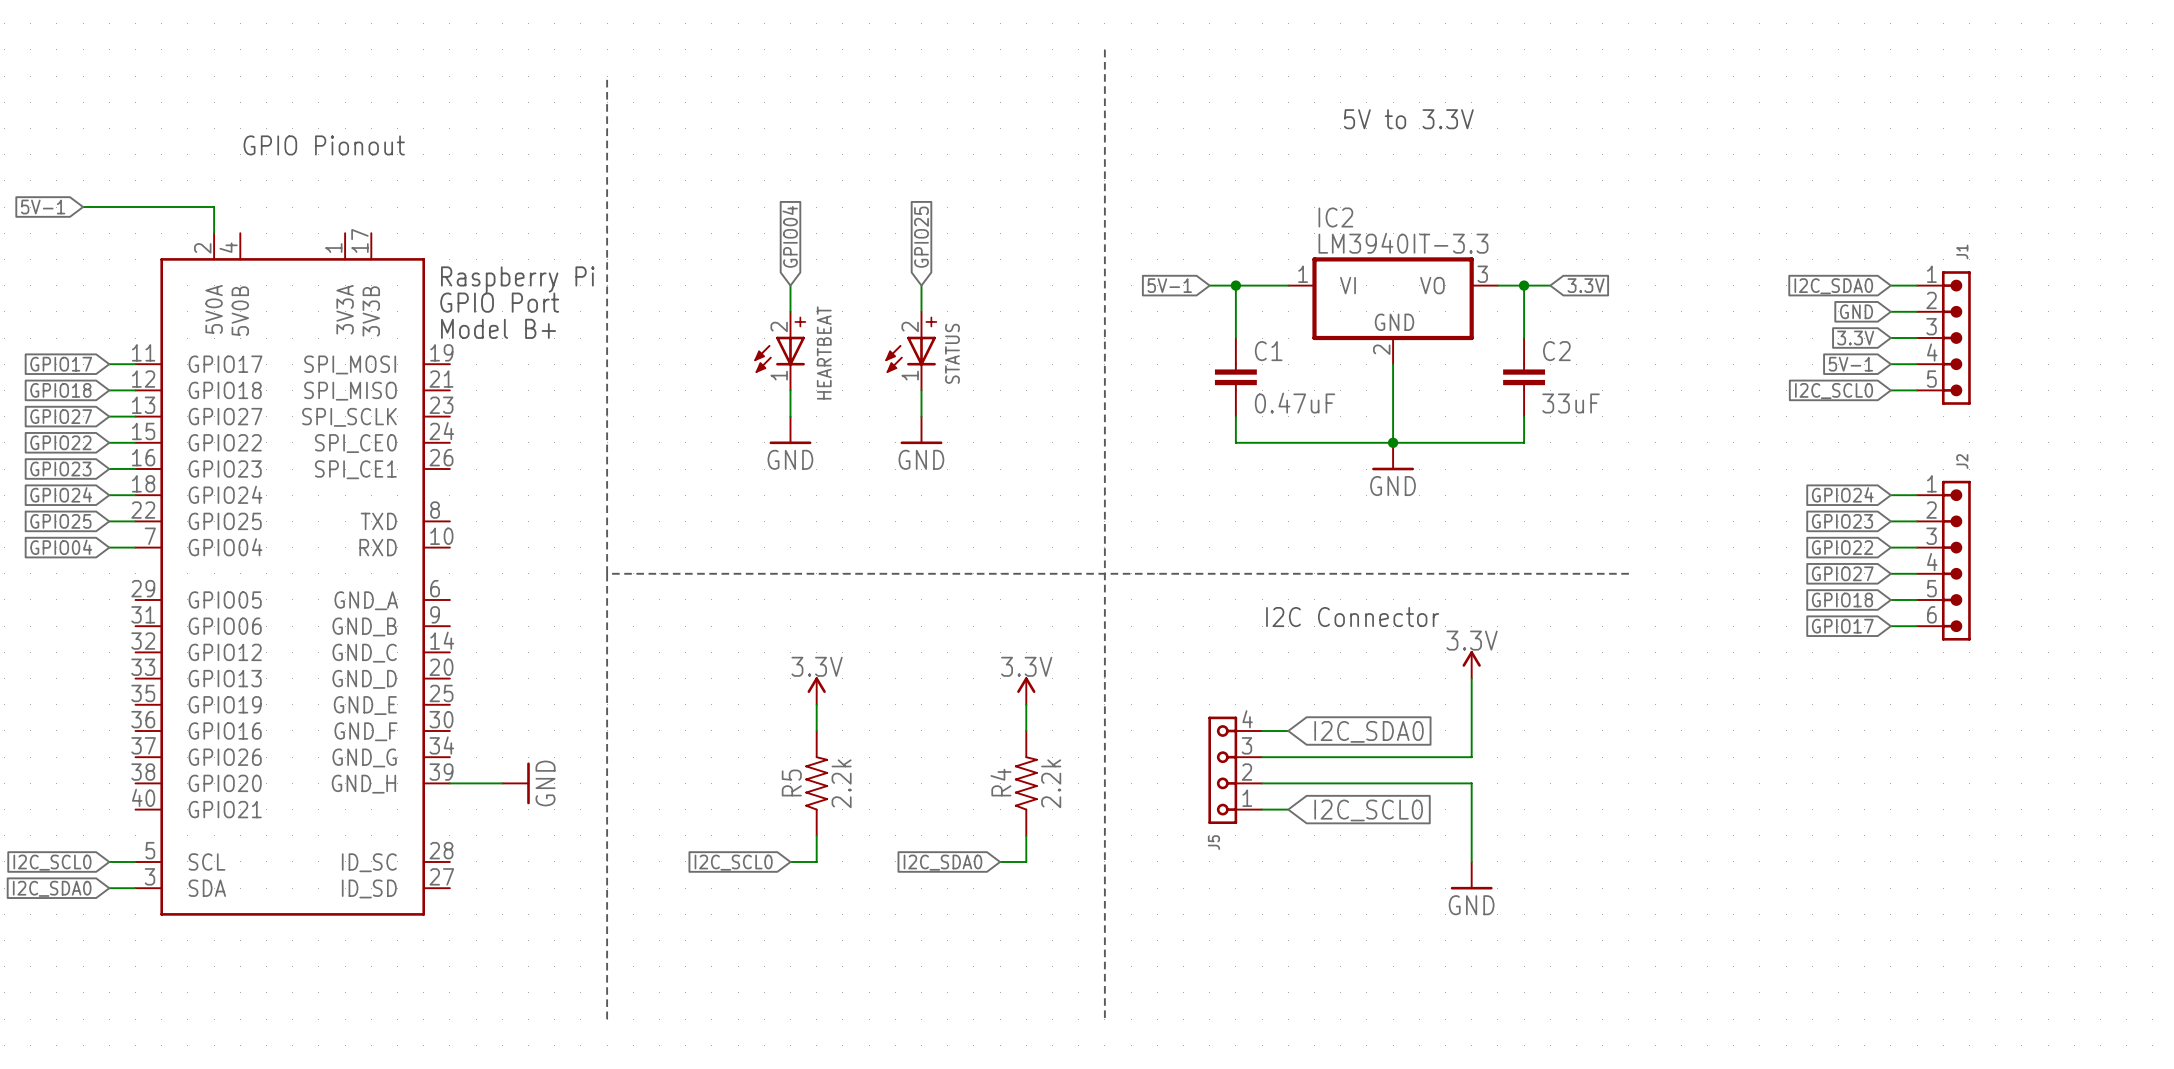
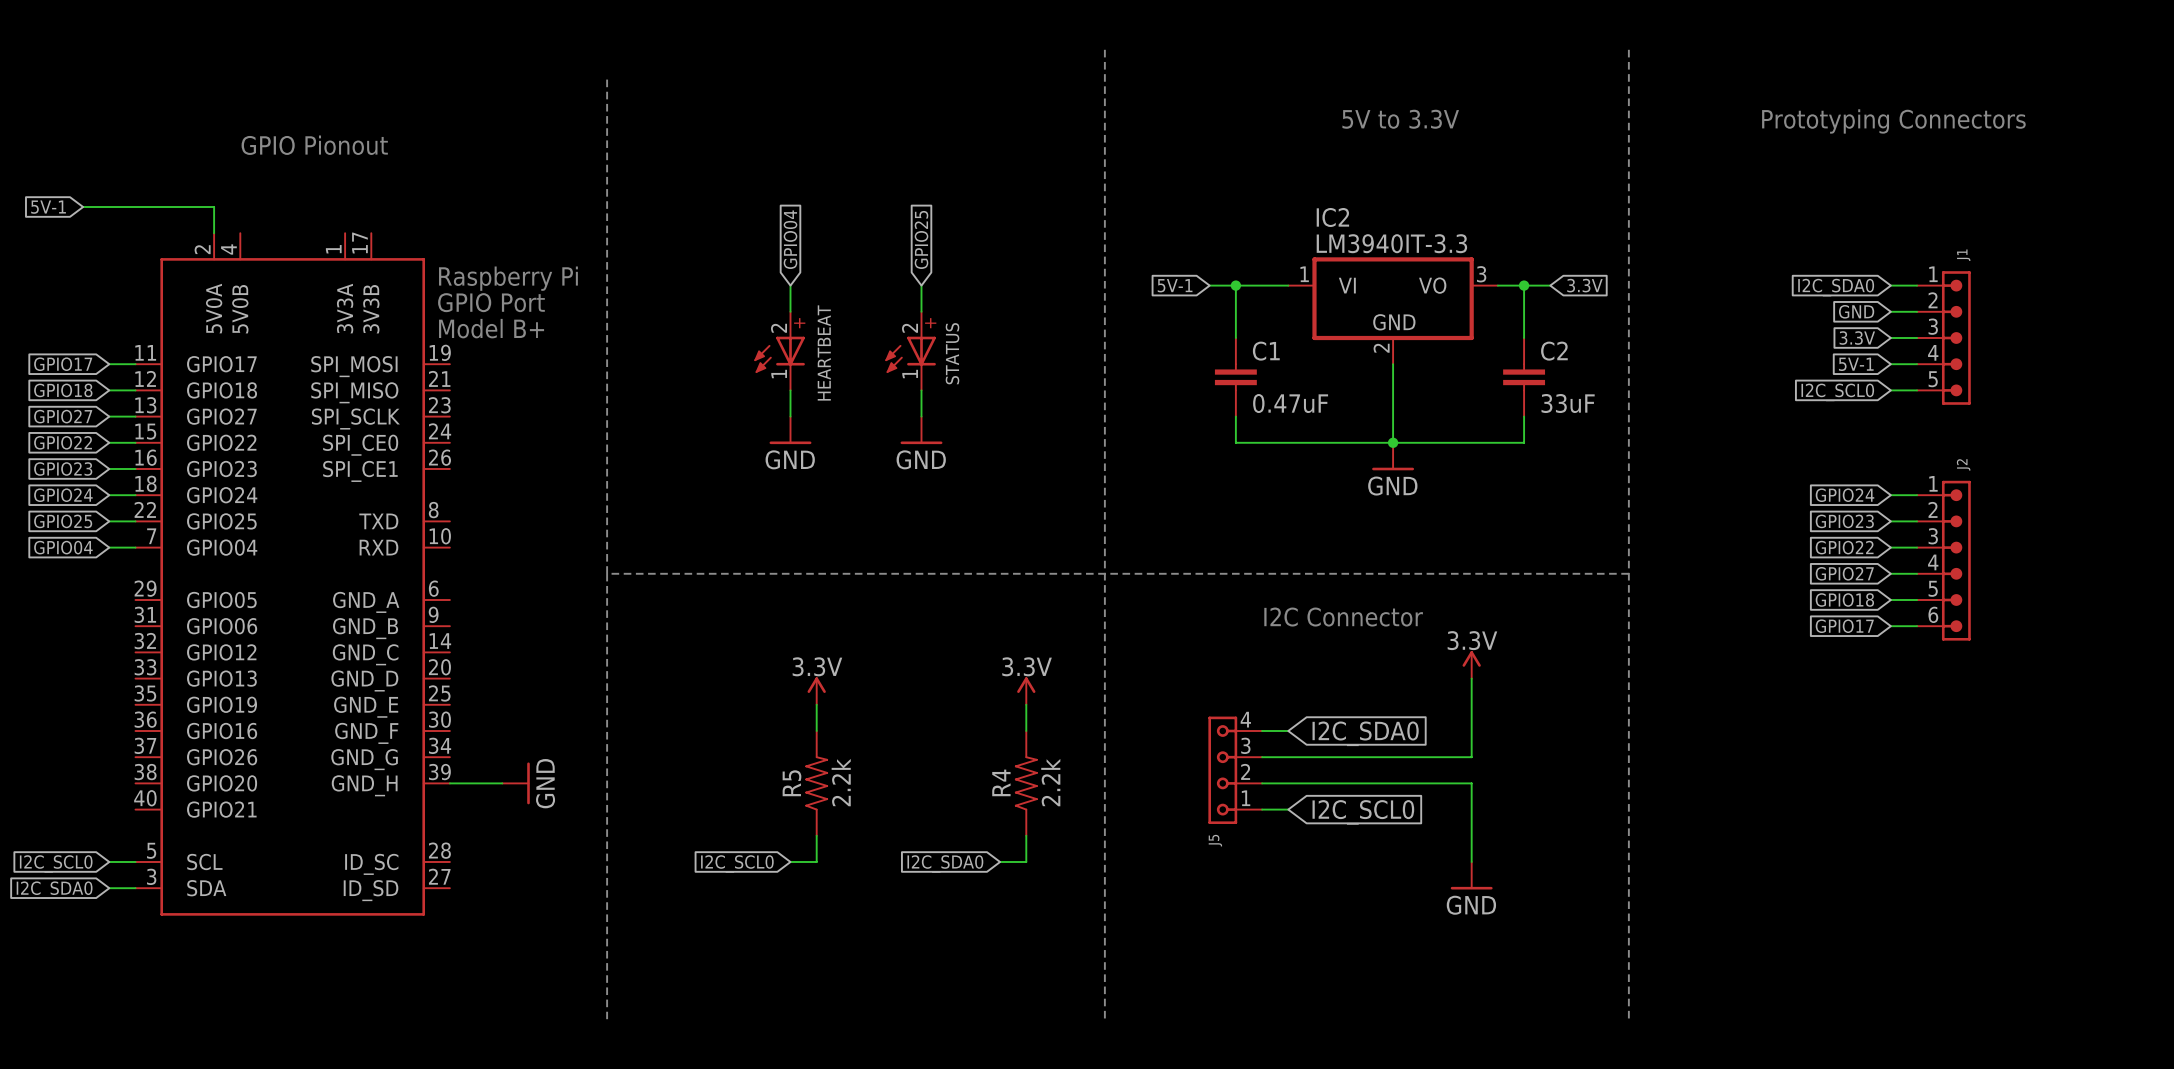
line: none -> (1628, 49) (1628, 1019)
text: none -> Prototyping Connectors (1893, 121)

